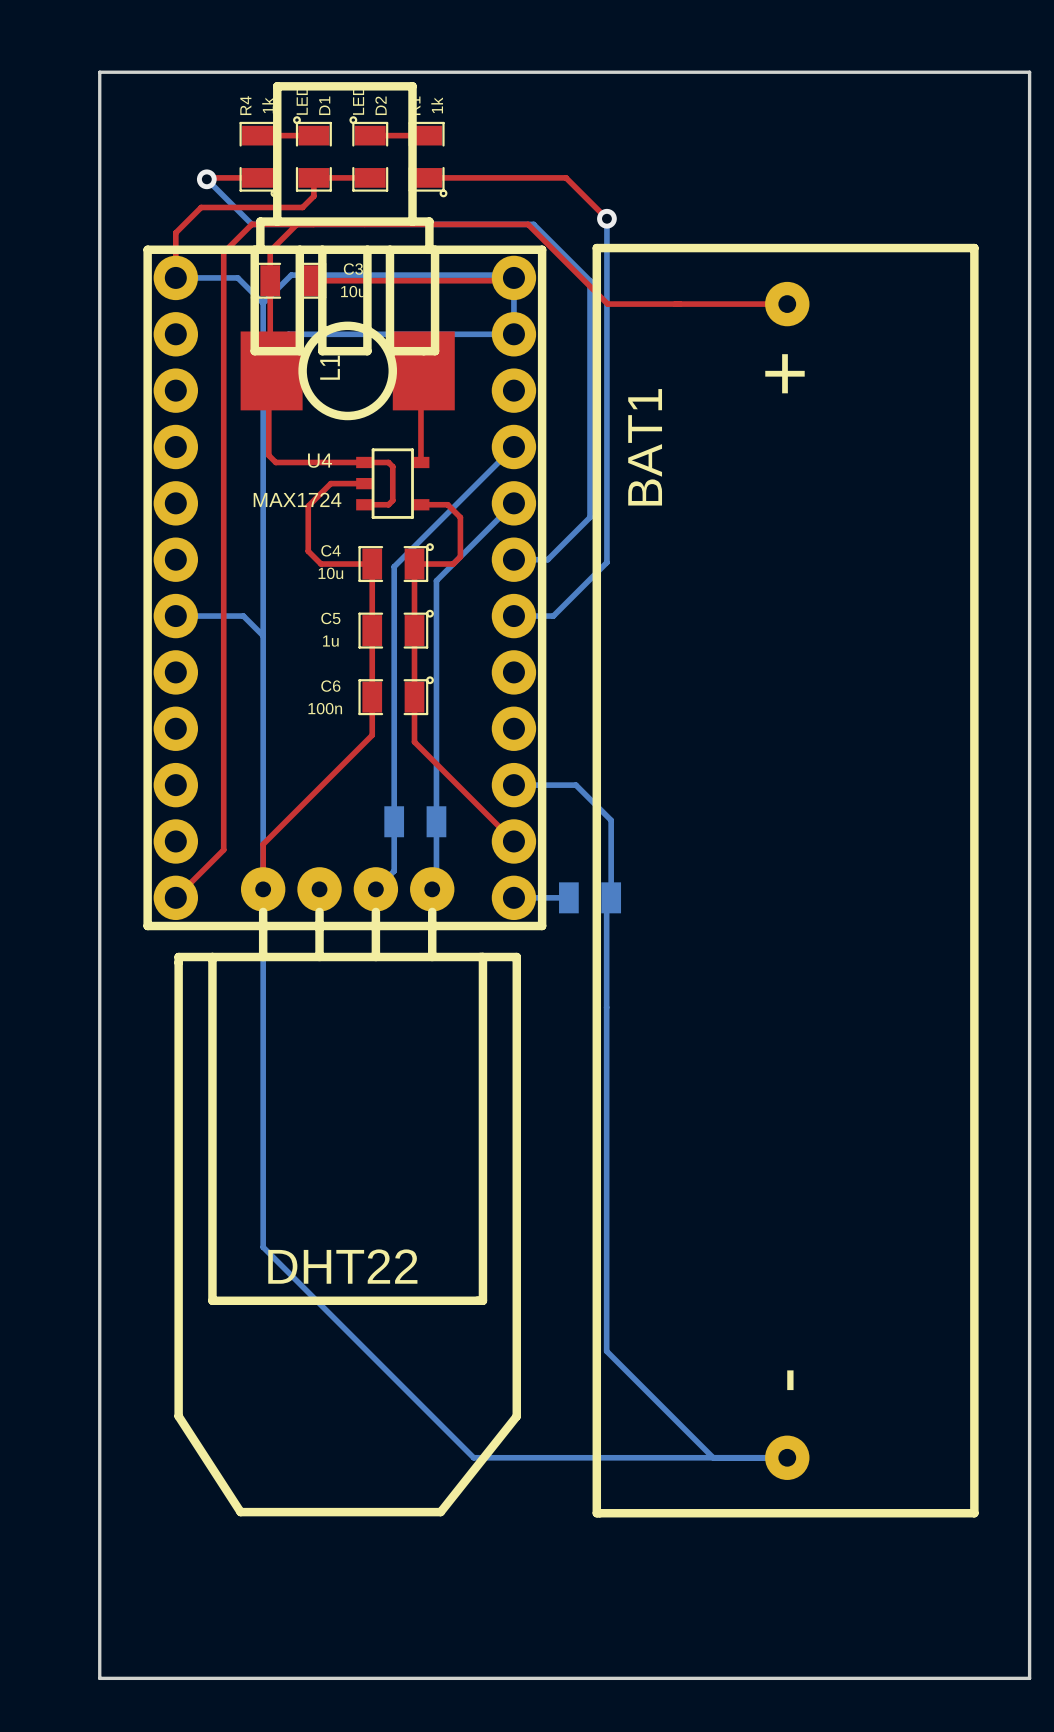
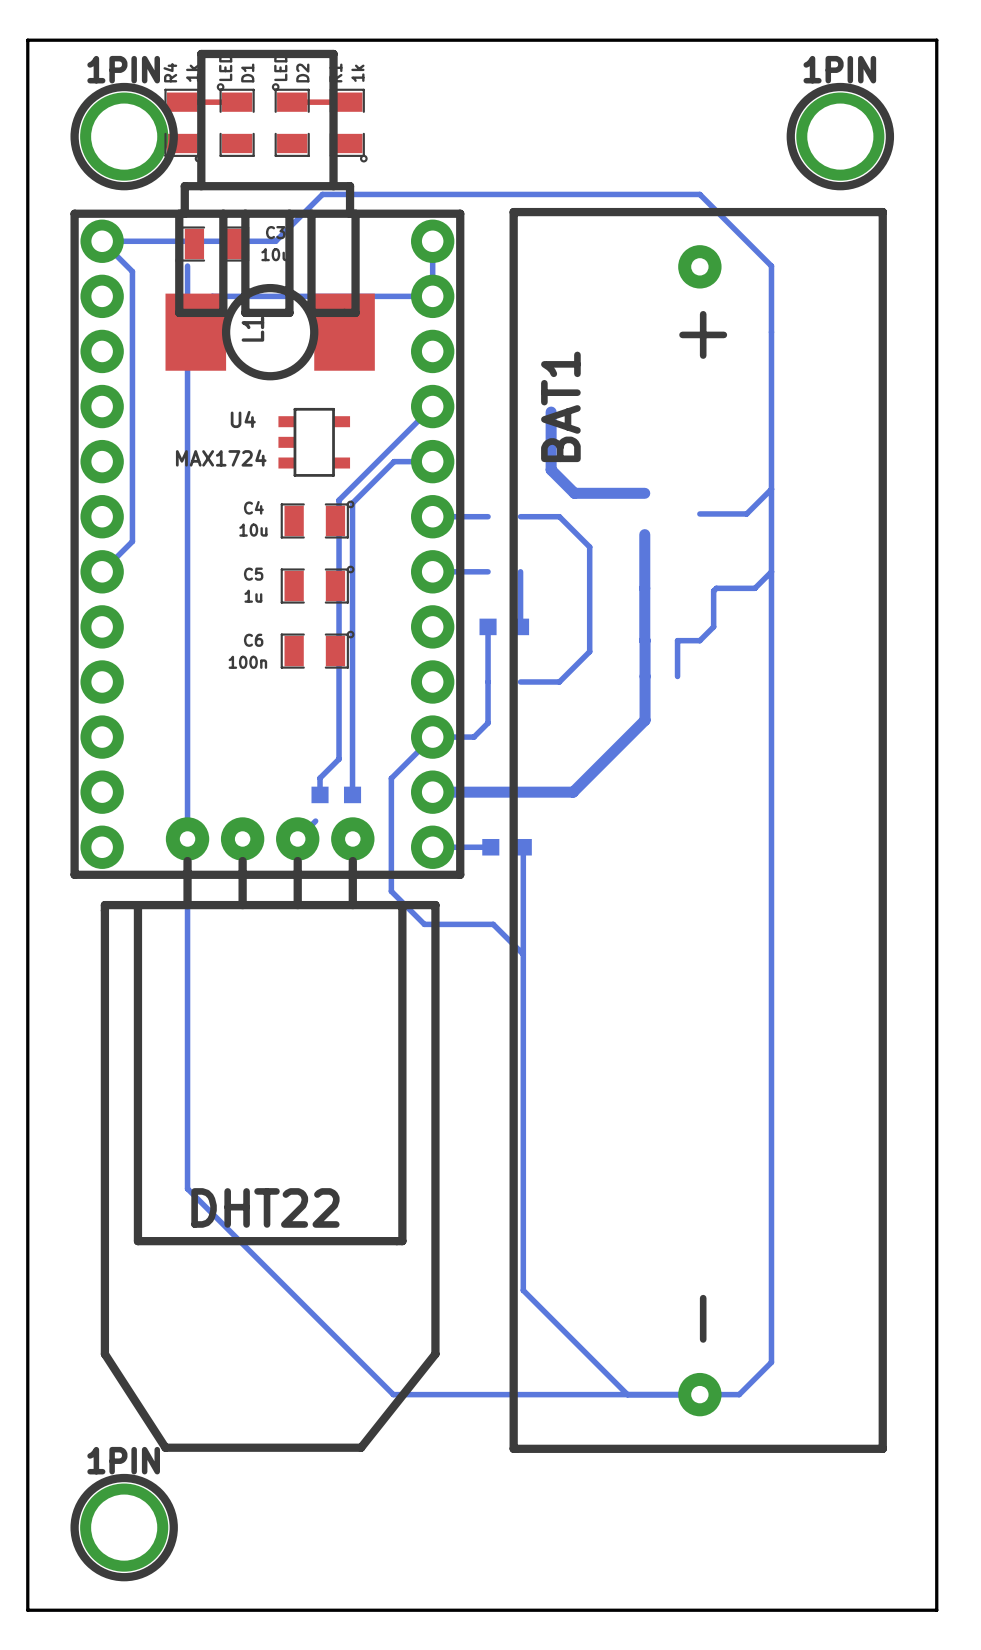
1PIN: none -> (124, 136)
1PIN: none -> (840, 136)
top track: (257, 177) (206, 179) -> none
top track: (370, 177) (313, 177) (313, 196) (302, 207) (201, 207) (175, 232) (175, 277) -> none
top track: (426, 177) (566, 177) (606, 218) -> none
bottom track: (206, 179) (251, 224) (533, 224) (590, 280) (590, 517) (547, 559) -> (488, 516) (465, 516)
via: (206, 179) -> none
bottom track: (606, 218) (606, 562) (553, 616) -> (488, 571) (471, 571)
via: (606, 218) -> none
top track: (296, 224) (270, 251) (271, 370) (268, 373) (268, 455) (275, 462) (388, 462) (392, 466) (392, 500) (388, 504) (364, 504) -> none
bottom track: (237, 277) (263, 303) (291, 275) (511, 275) (513, 277) -> (162, 241) (275, 241) (322, 194) (699, 194) (771, 266) (771, 1362) (739, 1394) (699, 1394)
top track: (513, 277) (511, 280) (312, 280) -> none
top track: (787, 304) (607, 304) (528, 224) (251, 224) (223, 252) (223, 849) (175, 897) -> none
top track: (423, 370) (420, 373) (420, 462) -> none
bottom track: none -> (551, 412) (551, 469) (574, 493) (644, 493)
top track: (364, 483) (330, 483) (308, 506) (308, 551) (321, 564) (372, 564) (372, 735) (263, 844) (263, 889) -> none
bottom track: (513, 503) (436, 580) (436, 885) (432, 889) -> (432, 461) (394, 461) (352, 503) (352, 794)
top track: (420, 504) (447, 504) (460, 517) (460, 556) (453, 564) (414, 564) (414, 742) (513, 841) -> none
bottom track: none -> (771, 489) (746, 513) (699, 513)
bottom track: (418, 542) (394, 566) (394, 871) -> (339, 500) (339, 759) (320, 778) (320, 794)
bottom track: none -> (520, 516) (559, 516) (589, 547) (589, 651) (559, 681) (520, 681)
bottom track: none -> (644, 534) (644, 640)
bottom track: (175, 616) (243, 616) (263, 635) -> (102, 571) (132, 541) (132, 271) (102, 241)
bottom track: none -> (520, 571) (520, 626)
bottom track: none -> (771, 571) (754, 588) (716, 588) (713, 591) (713, 626) (699, 640) (677, 640) (677, 676)
part: none -> (504, 626)
bottom track: none -> (645, 640) (645, 720) (573, 792) (432, 792)
bottom track: none -> (432, 737) (391, 778) (391, 891) (424, 924) (493, 924) (523, 954)
bottom track: (556, 785) (575, 785) (611, 820) (611, 897) -> (474, 737) (488, 723) (488, 626)
part: (415, 821) -> none
part: none -> (336, 794)
part footprint: [559, 882, 622, 914] -> [482, 838, 532, 856]
1PIN: none -> (124, 1527)

